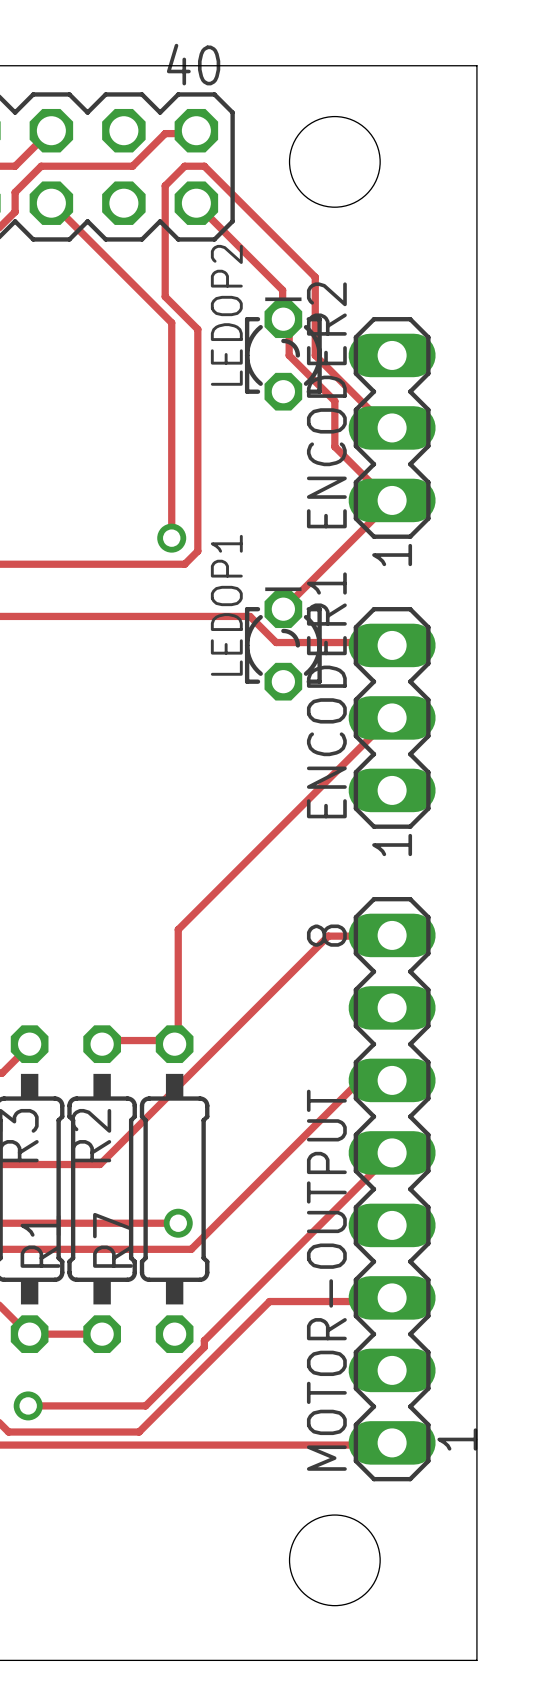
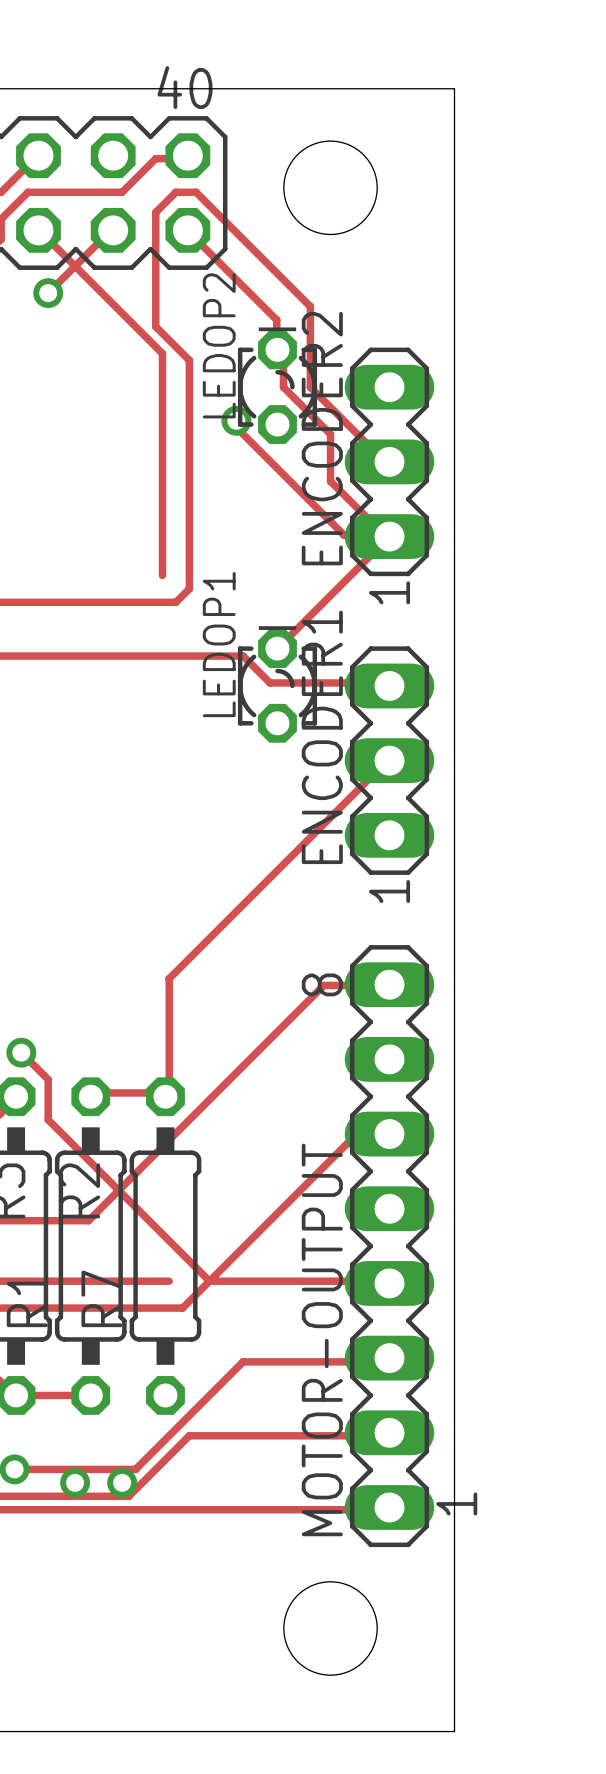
board edge: (455, 65) (476, 65) (476, 1660) (455, 1660) -> (454, 88) (454, 1731)
track: none -> (113, 230) (108, 232) (48, 293)
via: none -> (48, 293)
track: none -> (236, 420) (236, 427) (343, 535) (384, 535)
via: none -> (236, 420)
via: (171, 538) -> none
track: none -> (21, 1052) (48, 1079) (48, 1119) (209, 1281) (384, 1281) (389, 1283)
via: none -> (21, 1052)
track: (392, 1152) (204, 1340) (204, 1347) -> none
via: (178, 1223) -> none
track: (269, 1301) (197, 1373) -> (263, 1361) (243, 1361) (196, 1408)
track: none -> (389, 1432) (384, 1435) (189, 1435)
via: none -> (75, 1482)
via: none -> (122, 1482)

